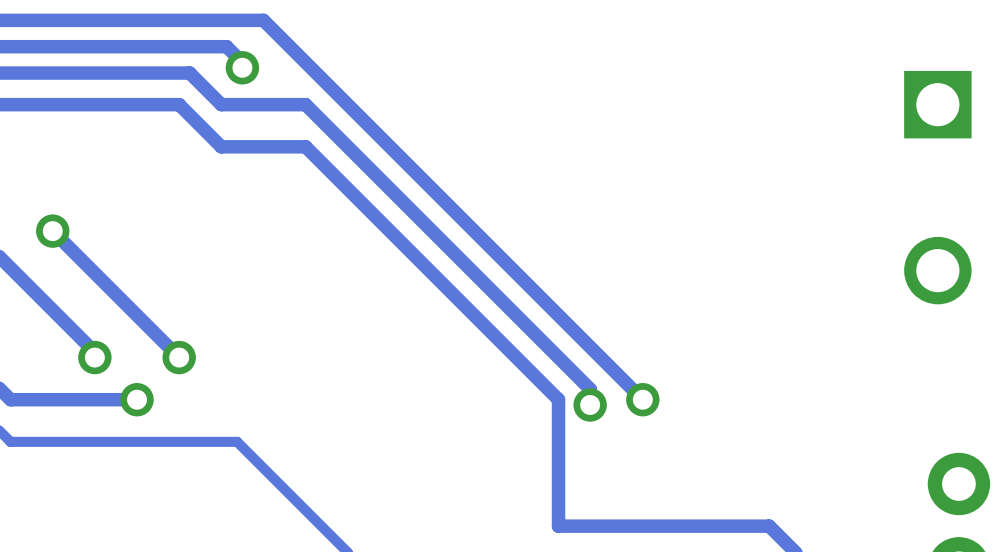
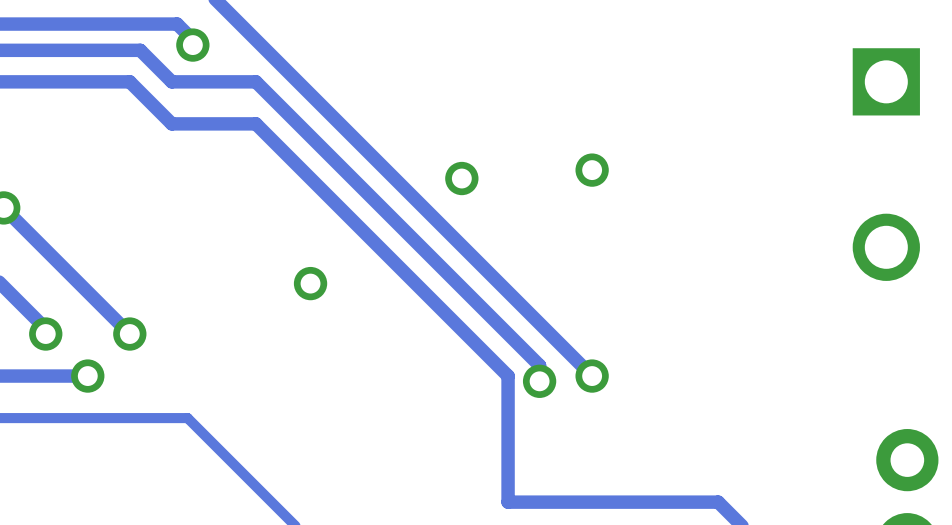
via: none -> (592, 170)
via: none -> (461, 178)
via: none -> (310, 283)

